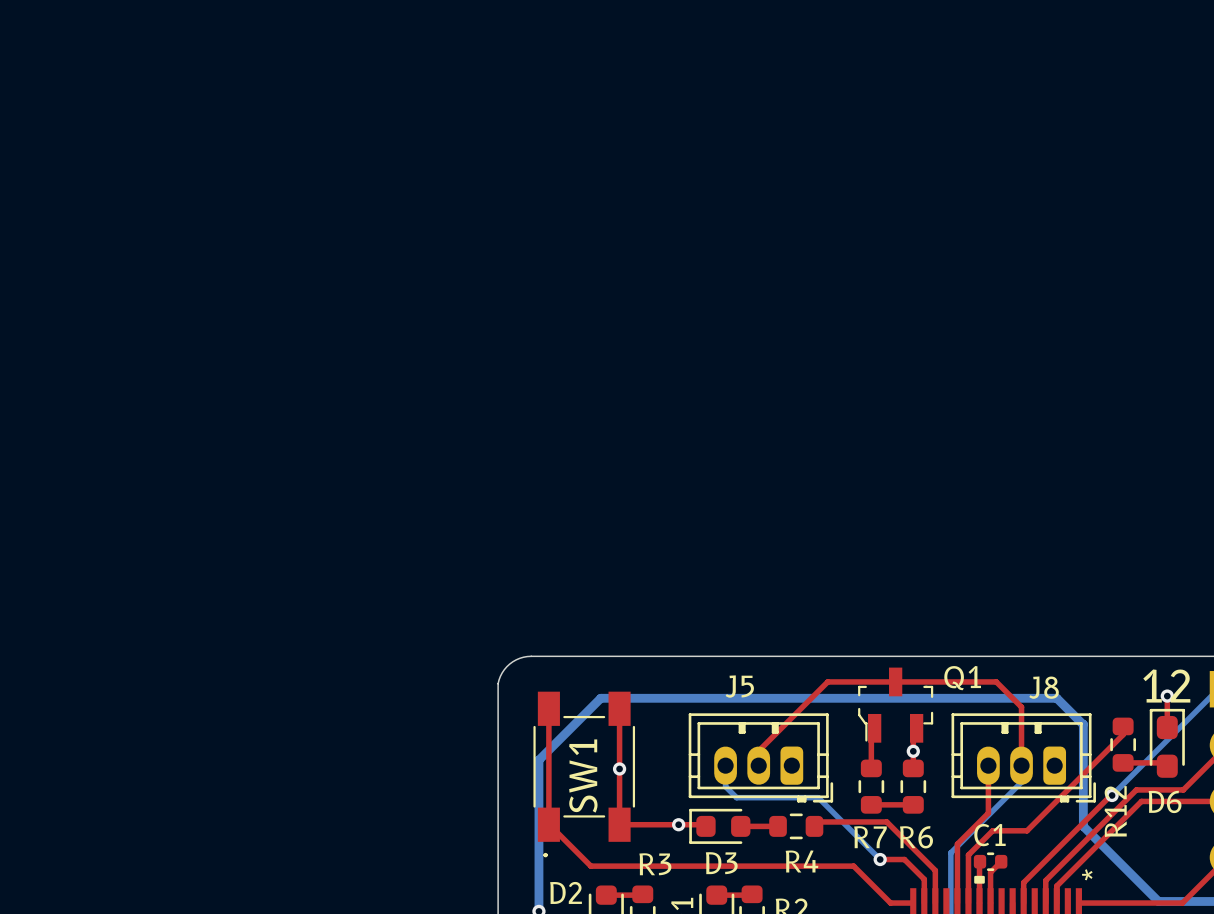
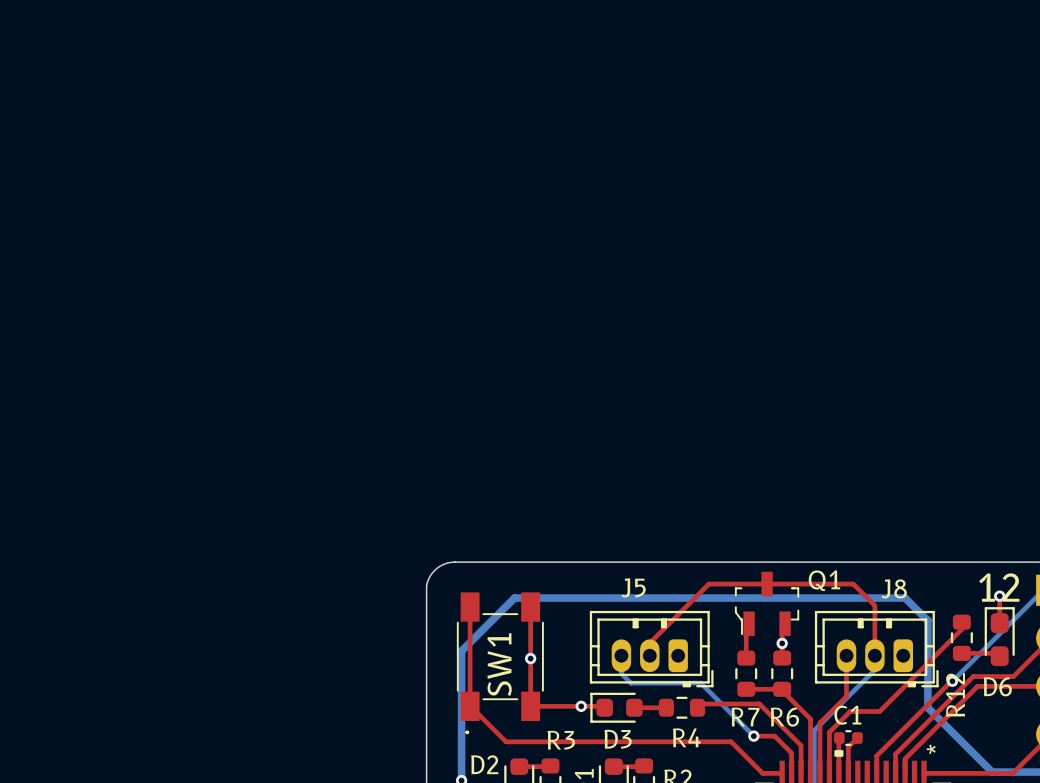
top track: none -> (782, 689) (810, 719) (810, 773)

